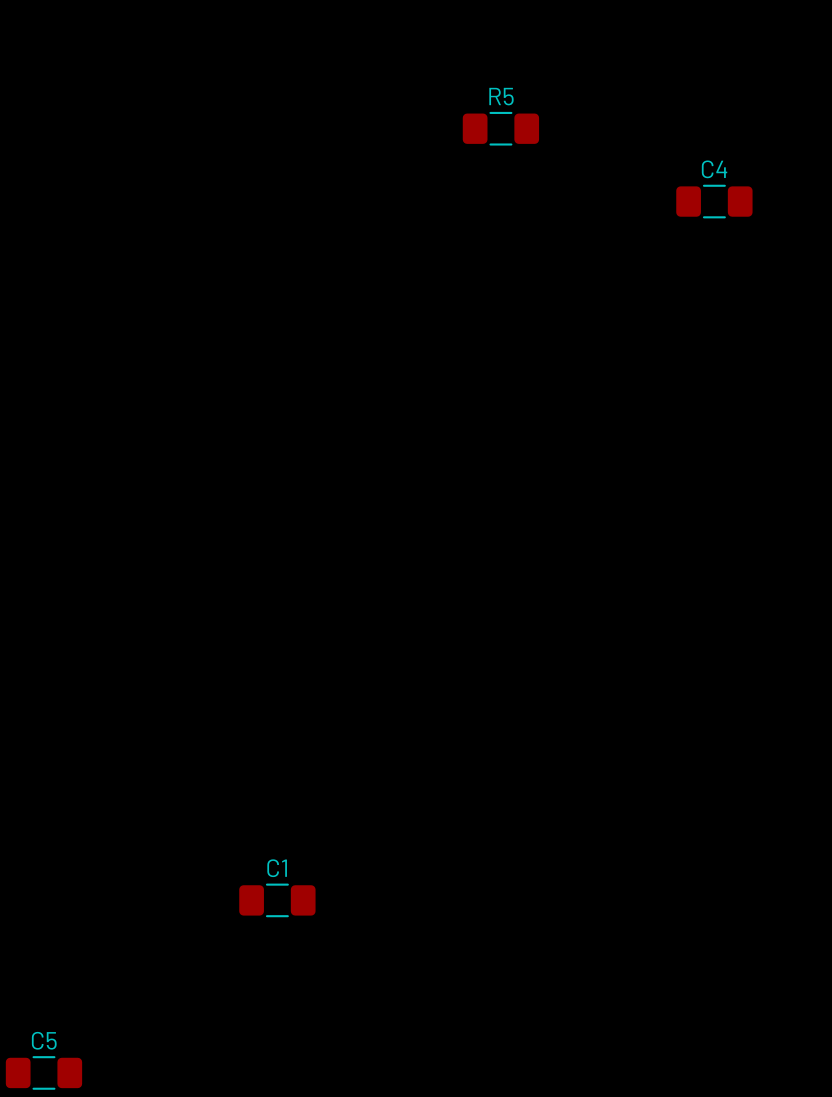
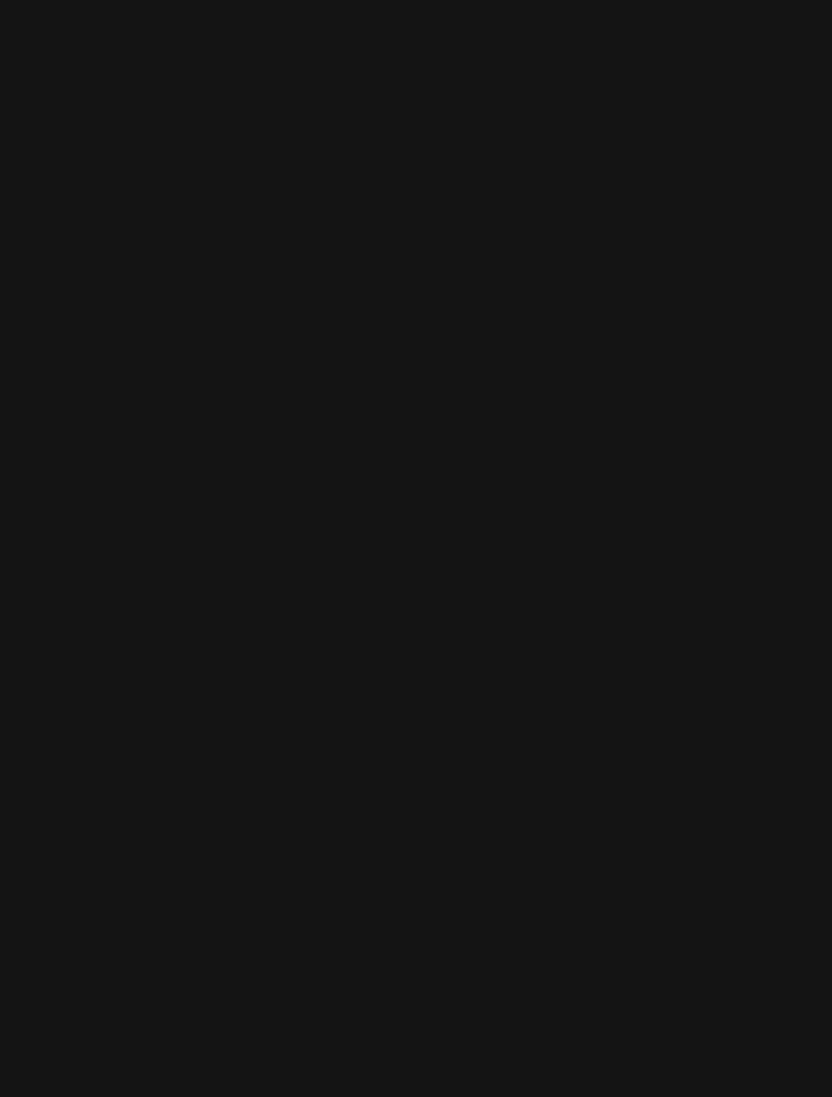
R5: (500, 128) -> none
C4: (714, 201) -> none
C1: (277, 900) -> none
C5: (43, 1072) -> none

